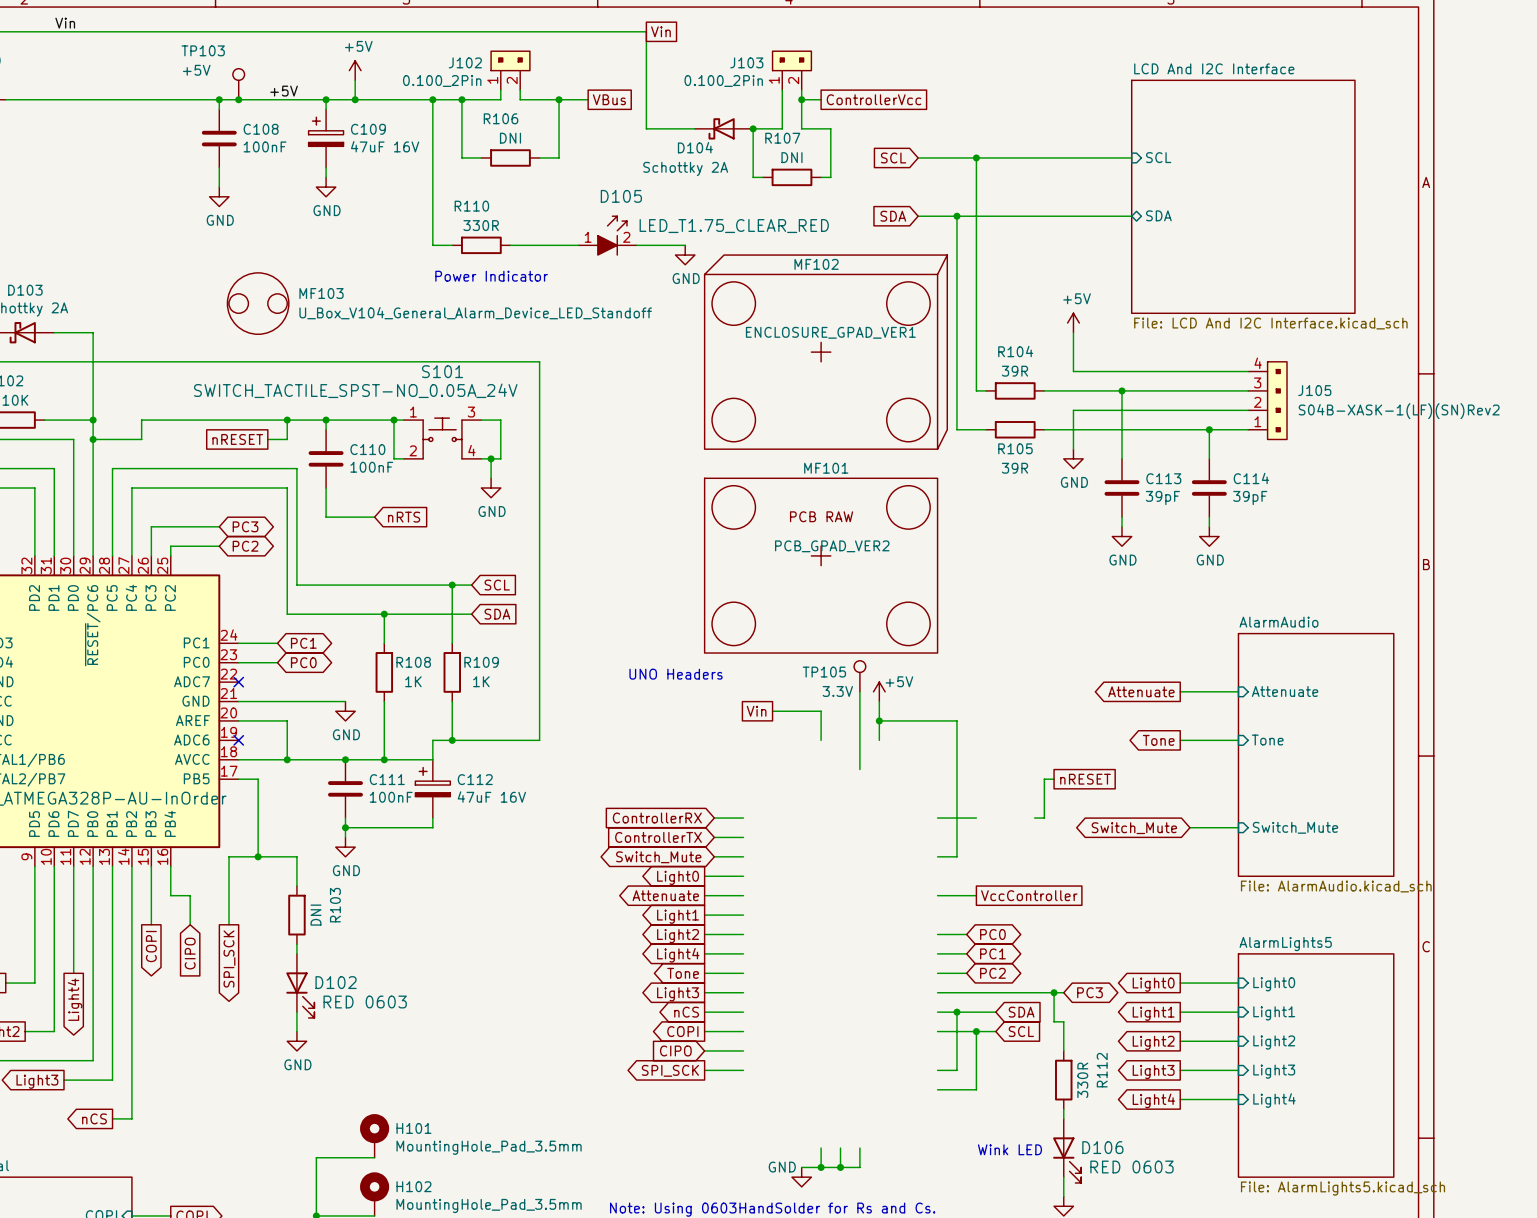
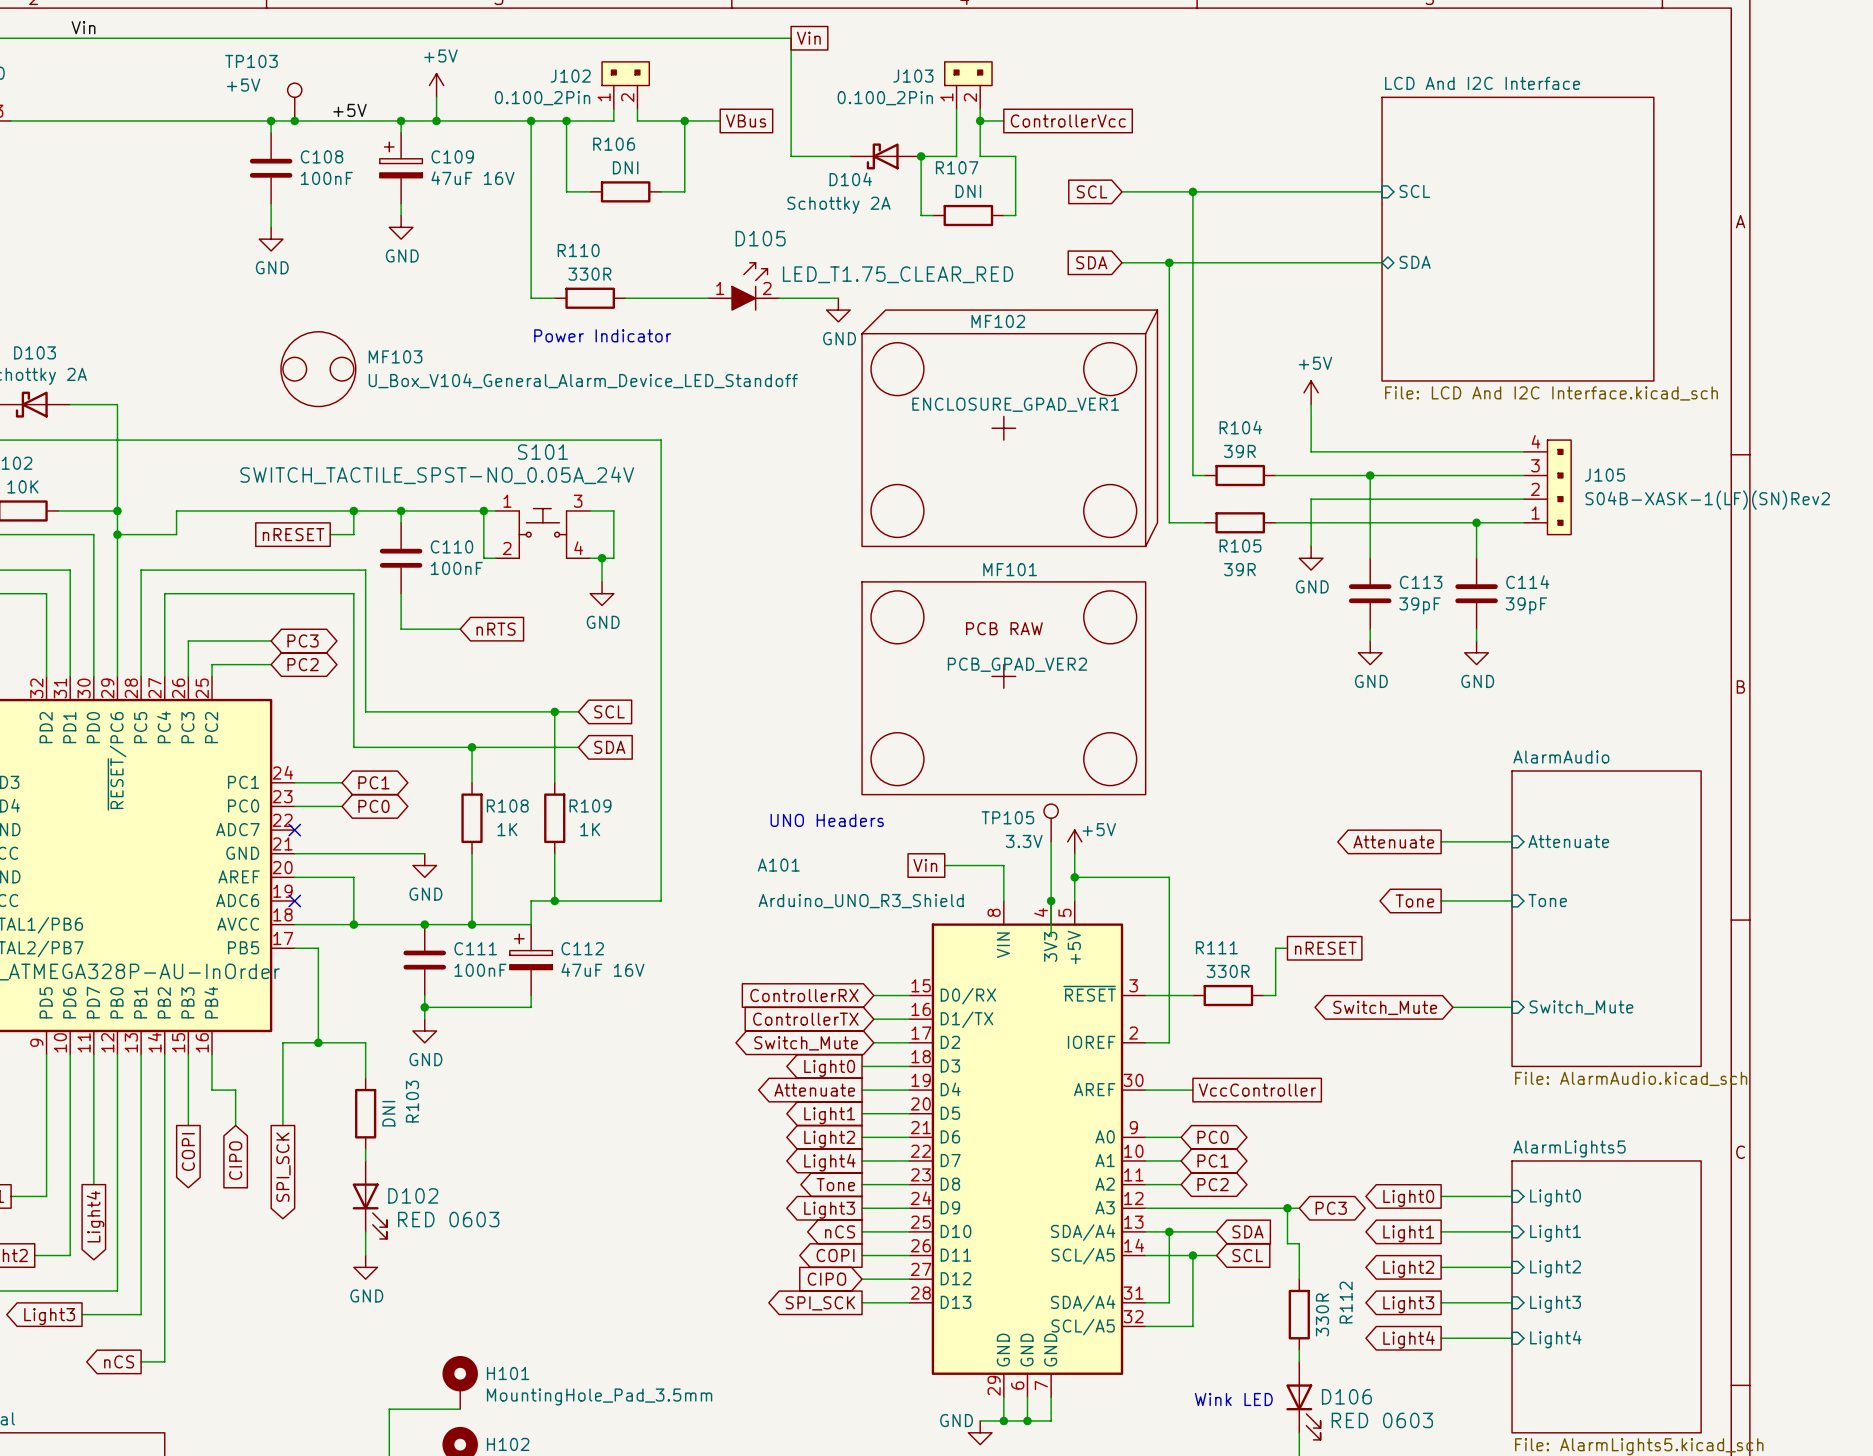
junction: none -> (1051, 900)
R111: none -> 330R (1228, 995)
A101: none -> Arduino_UNO_R3_Shield (1027, 1149)

